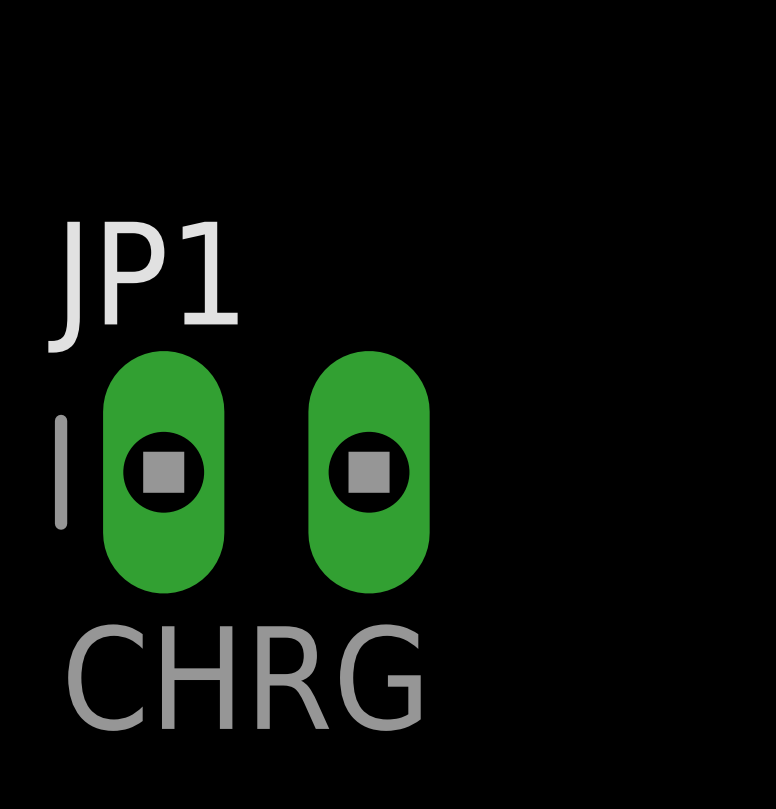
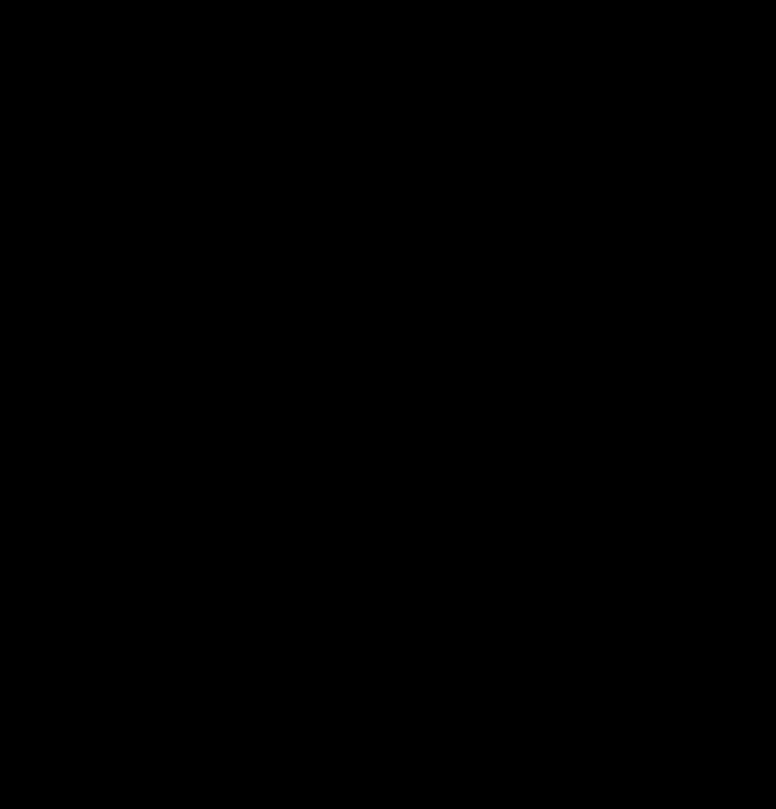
JP1: CHRG (242, 472) -> none

